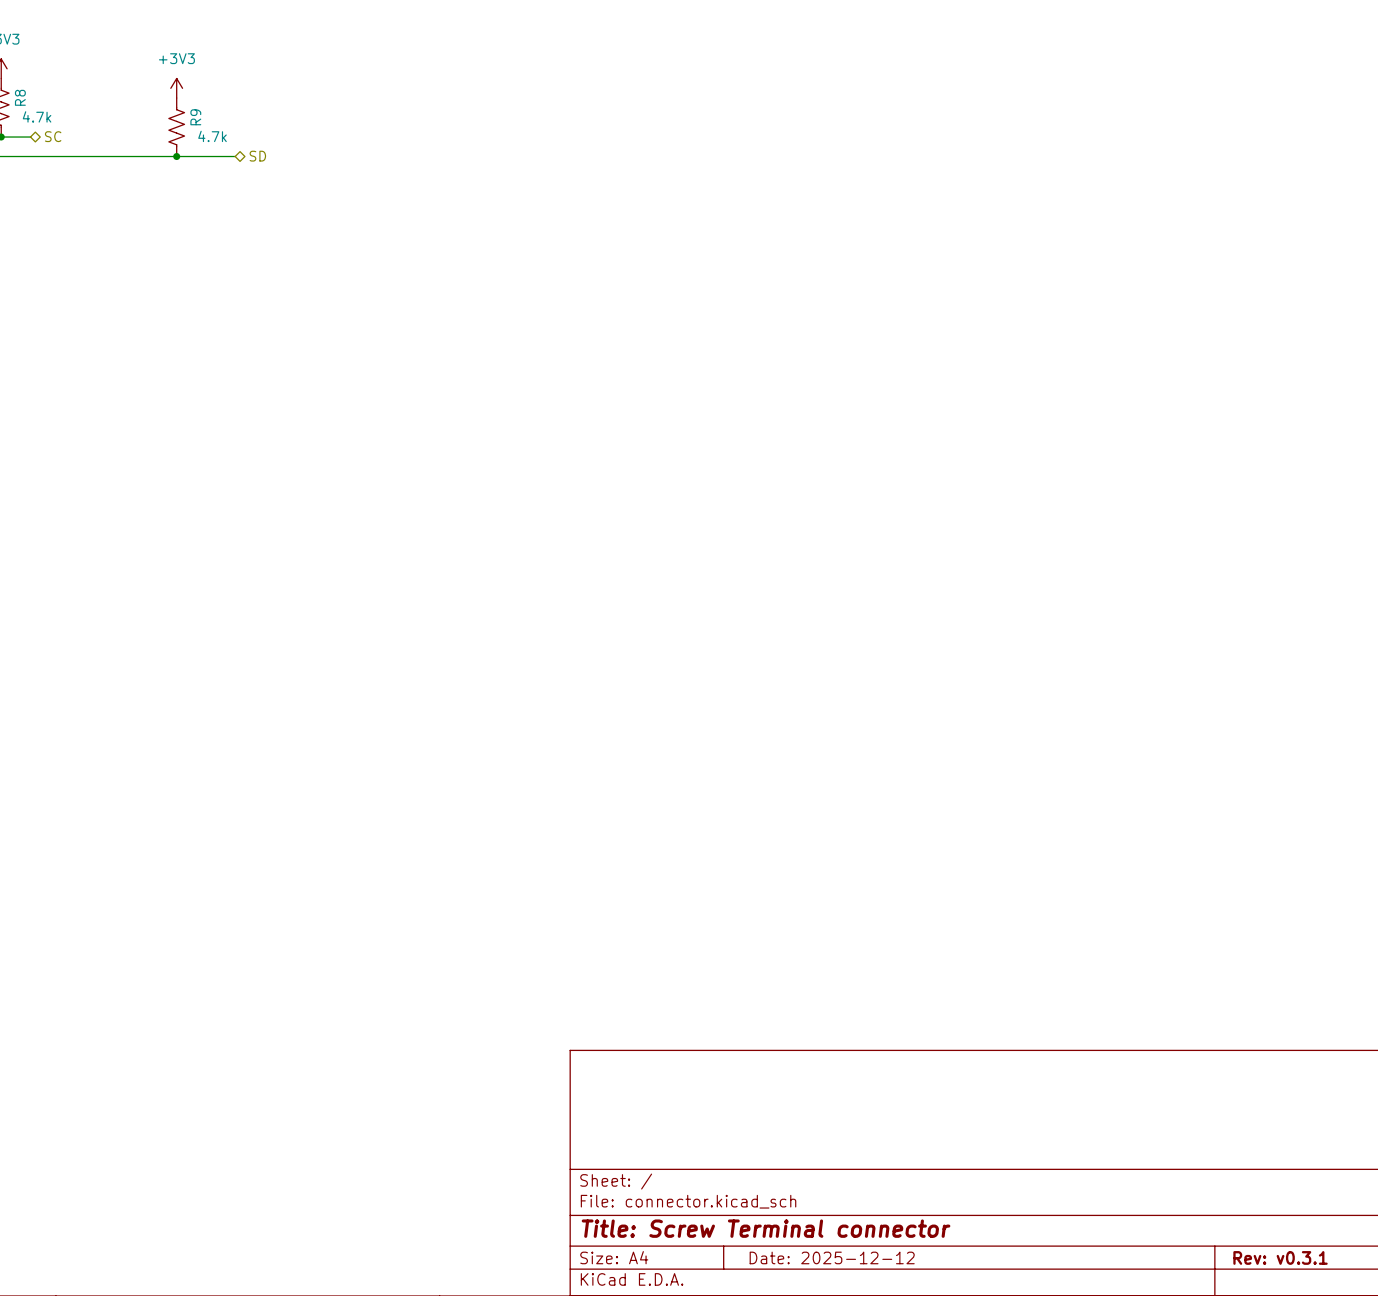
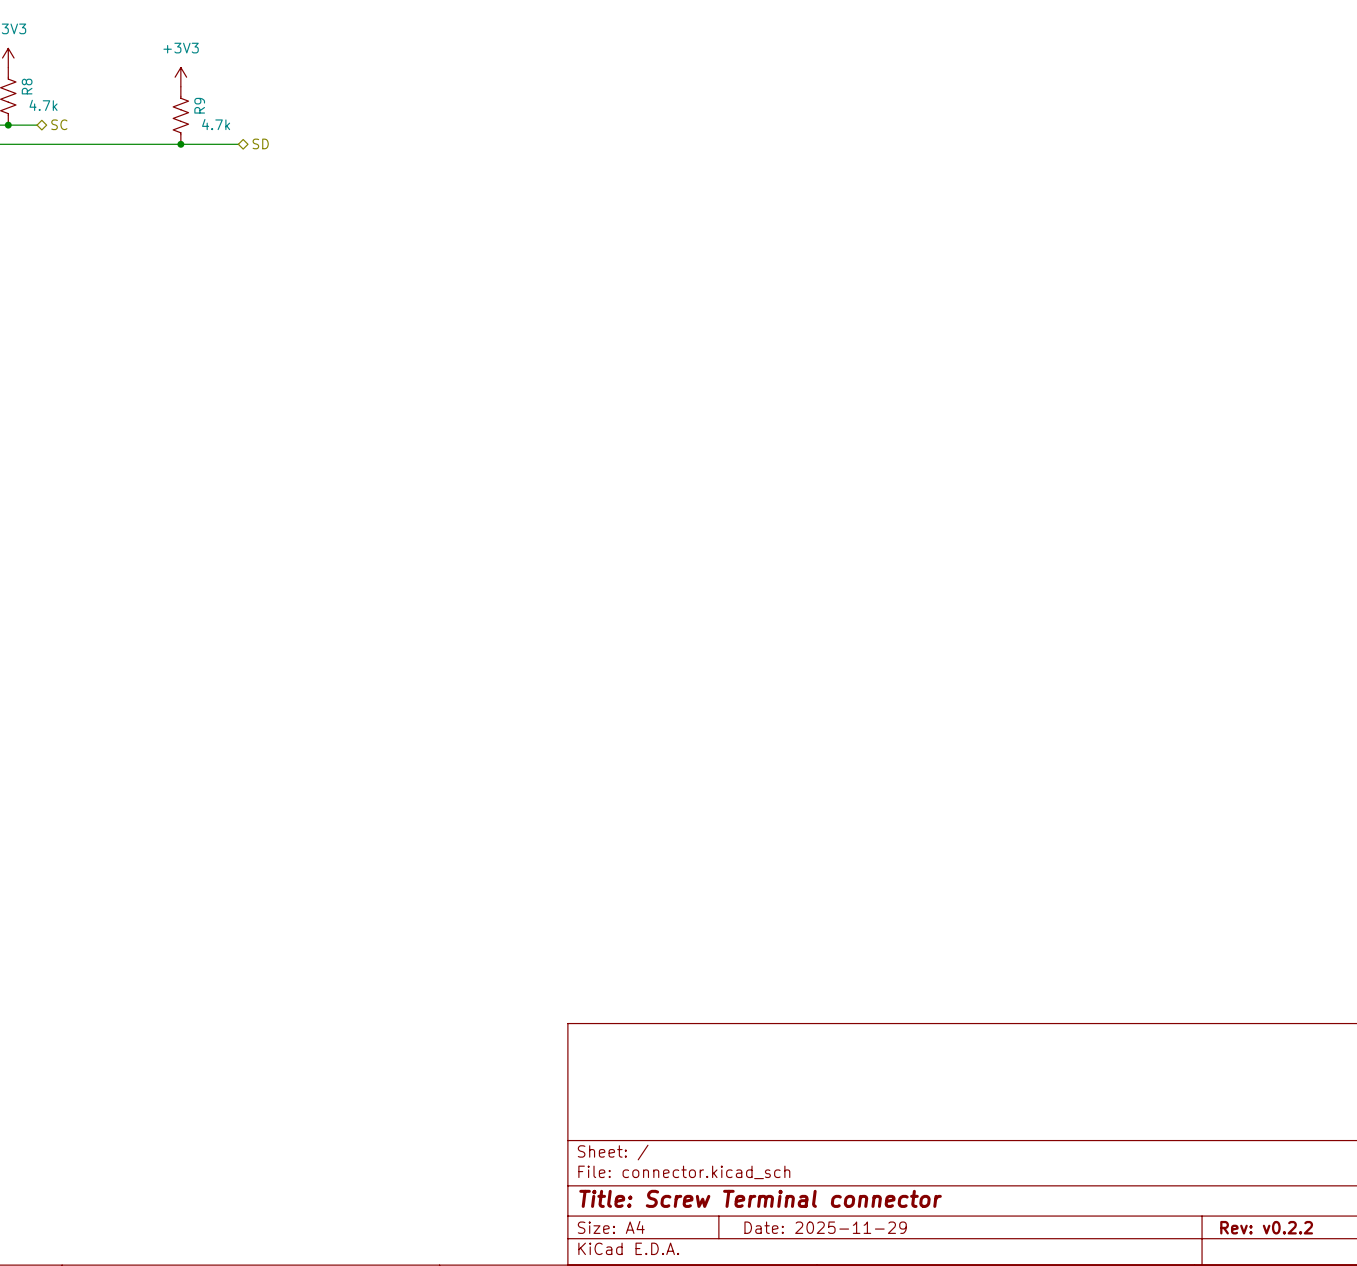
title block: Date: 2025-12-12 (832, 1257) -> Date: 2025-11-29 (825, 1227)
title block: Rev: v0.3.1 (1280, 1257) -> Rev: v0.2.2 (1266, 1227)

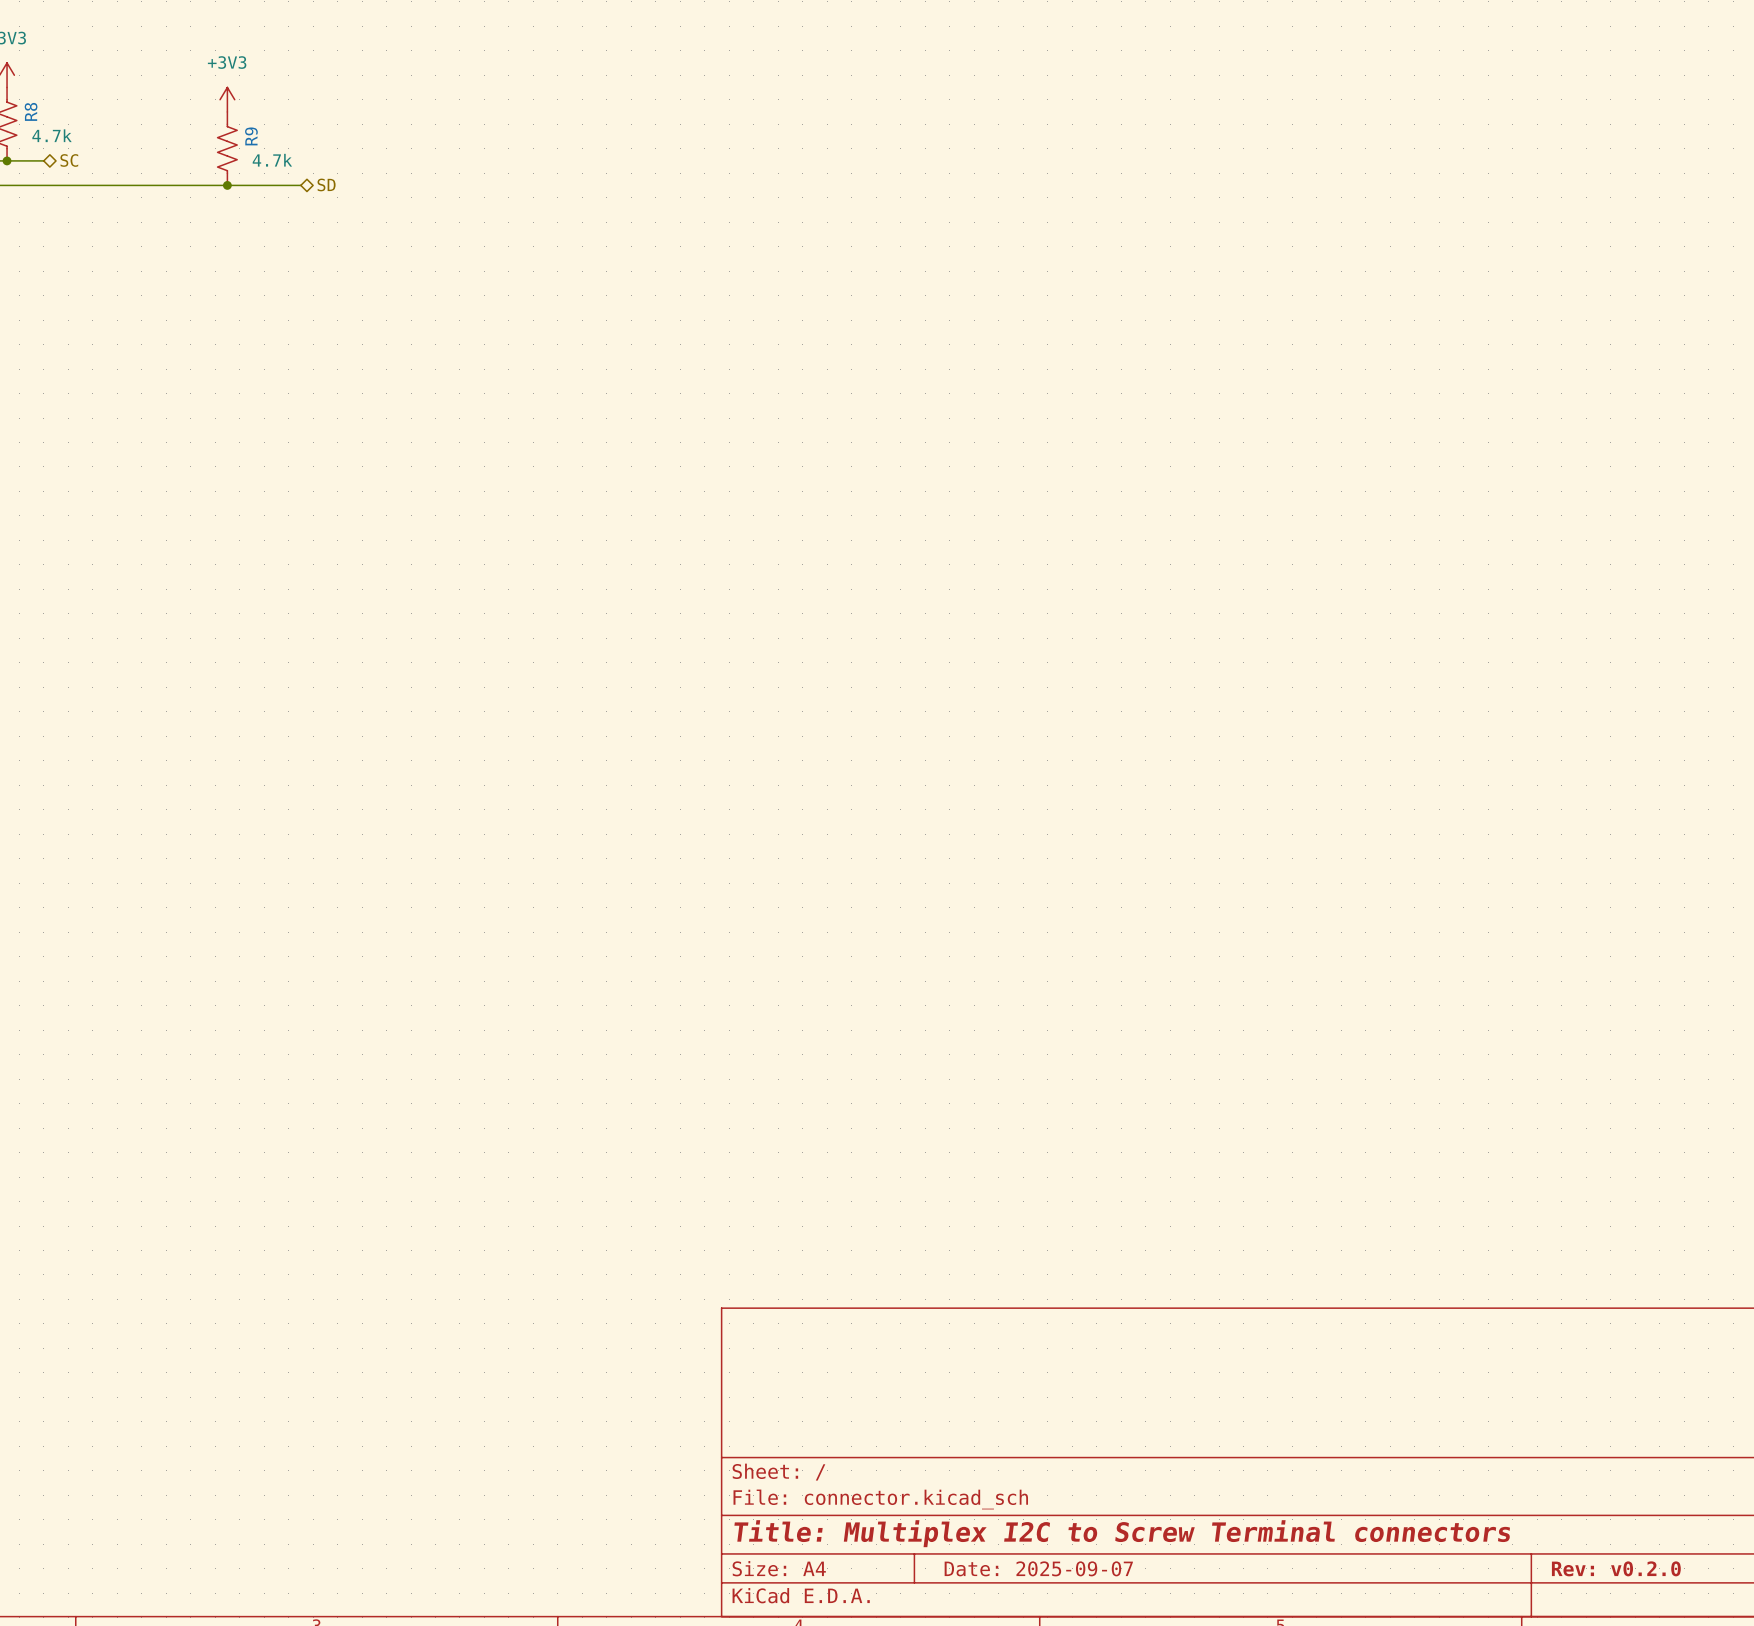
title block: Title: Screw Terminal connector (760, 1198) -> Title: Multiplex I2C to Screw Terminal connectors (1122, 1533)
title block: Date: 2025-11-29 (825, 1227) -> Date: 2025-09-07 (1038, 1568)
title block: Rev: v0.2.2 (1266, 1227) -> Rev: v0.2.0 (1616, 1568)

